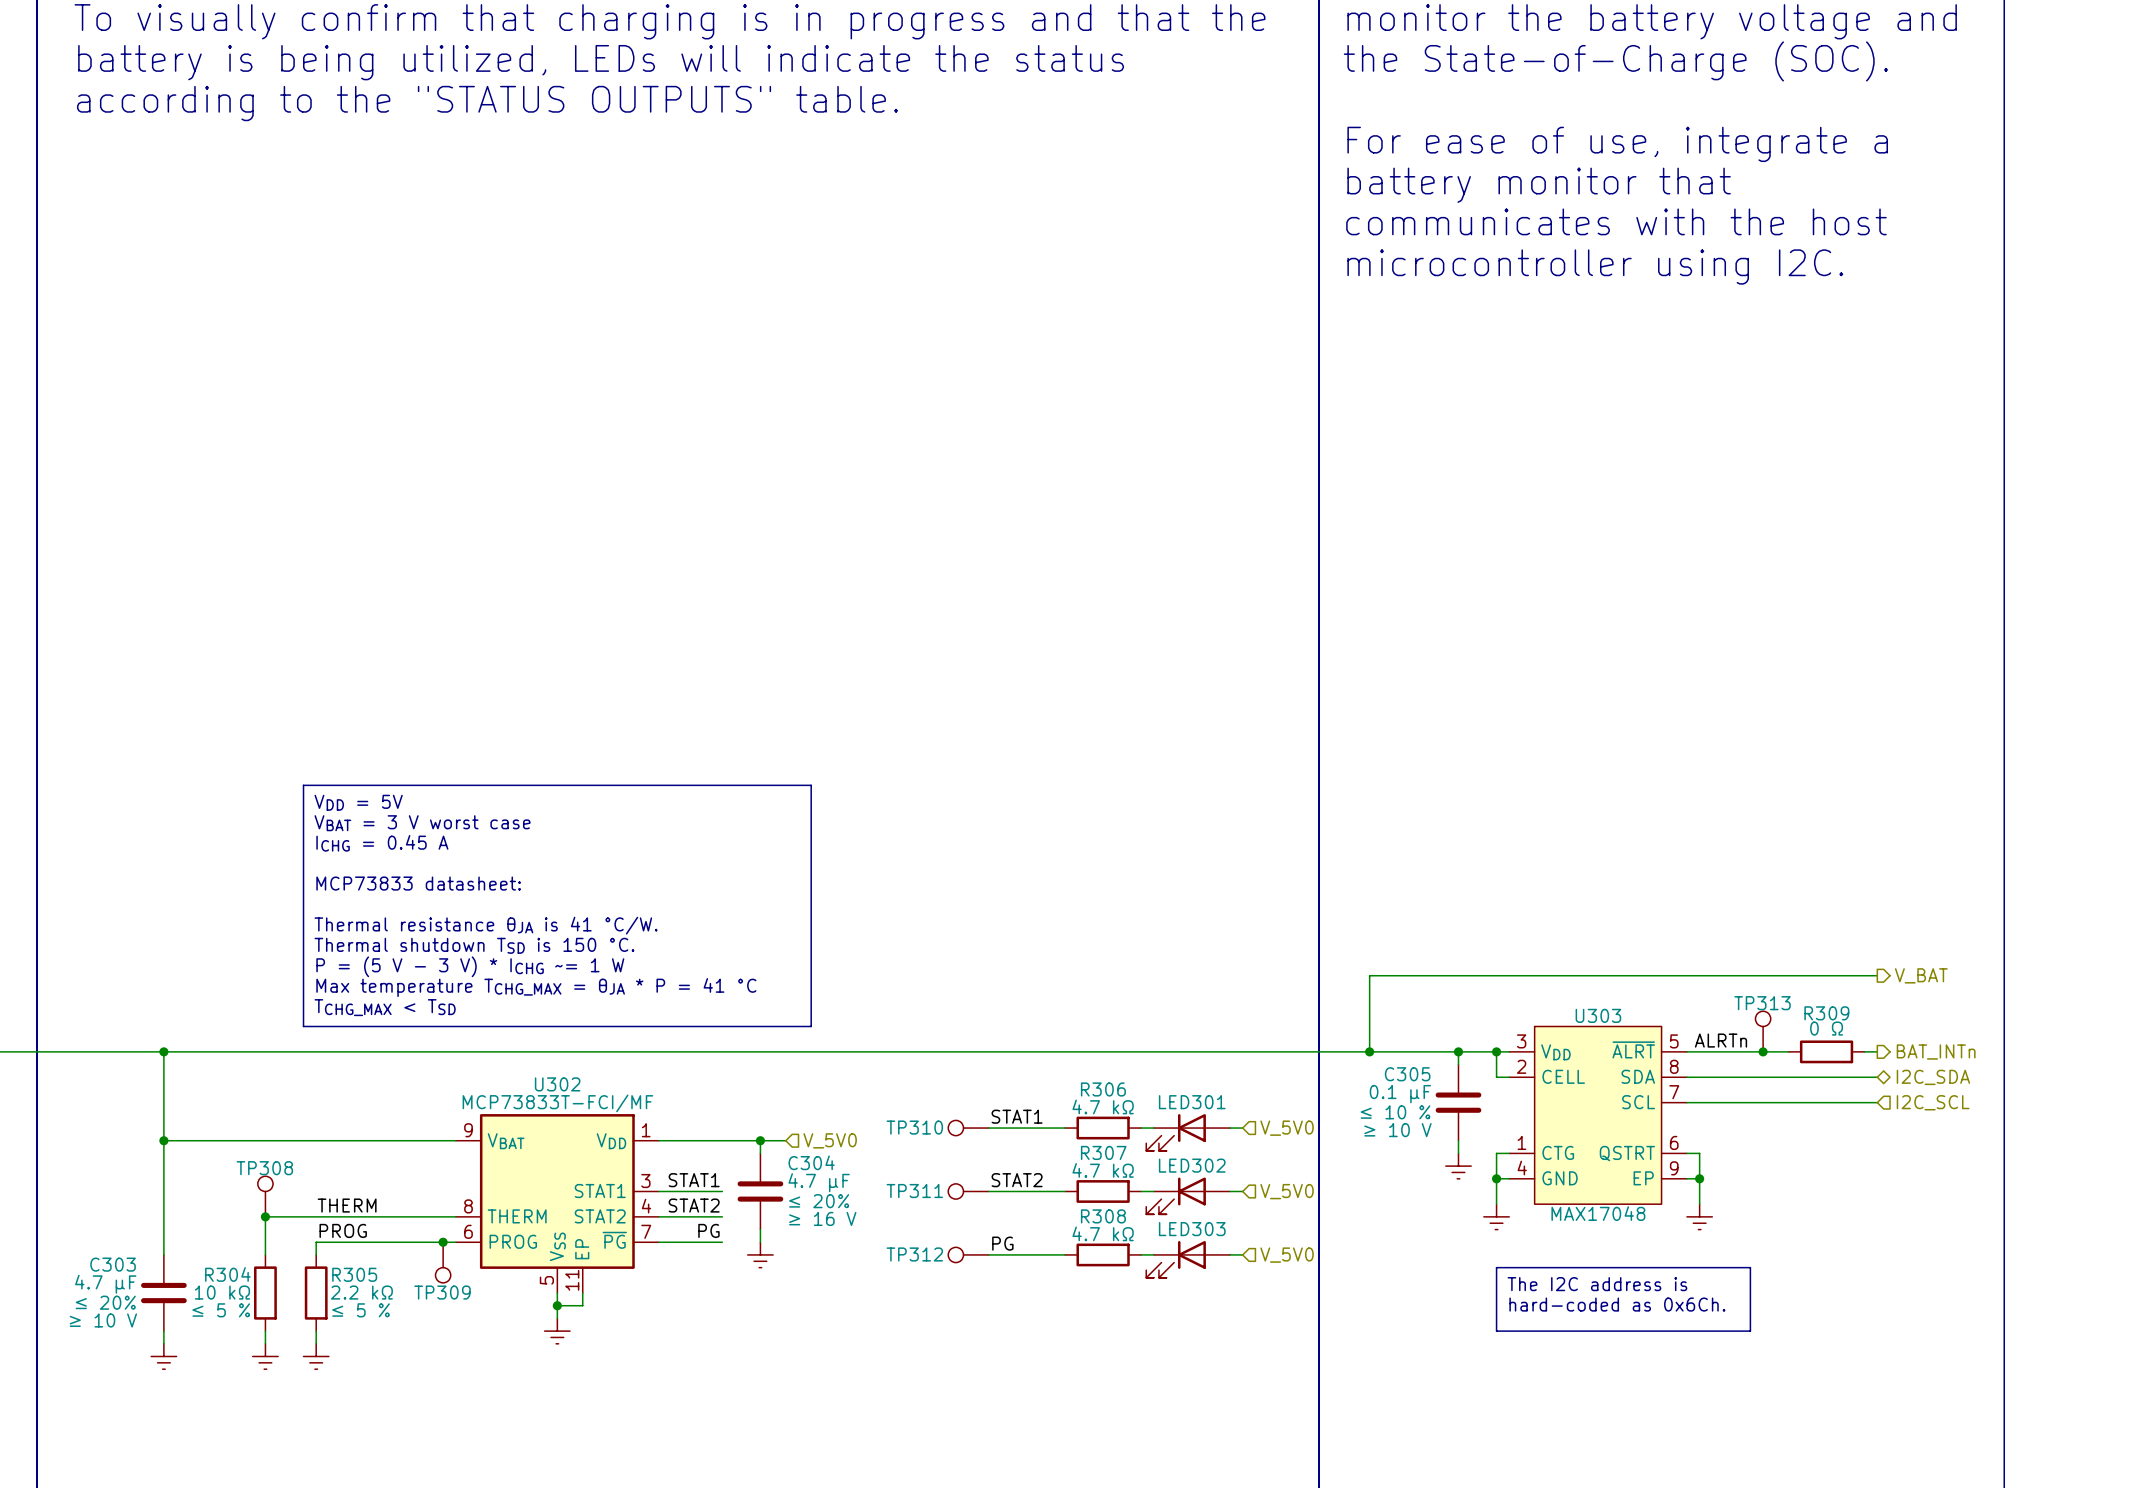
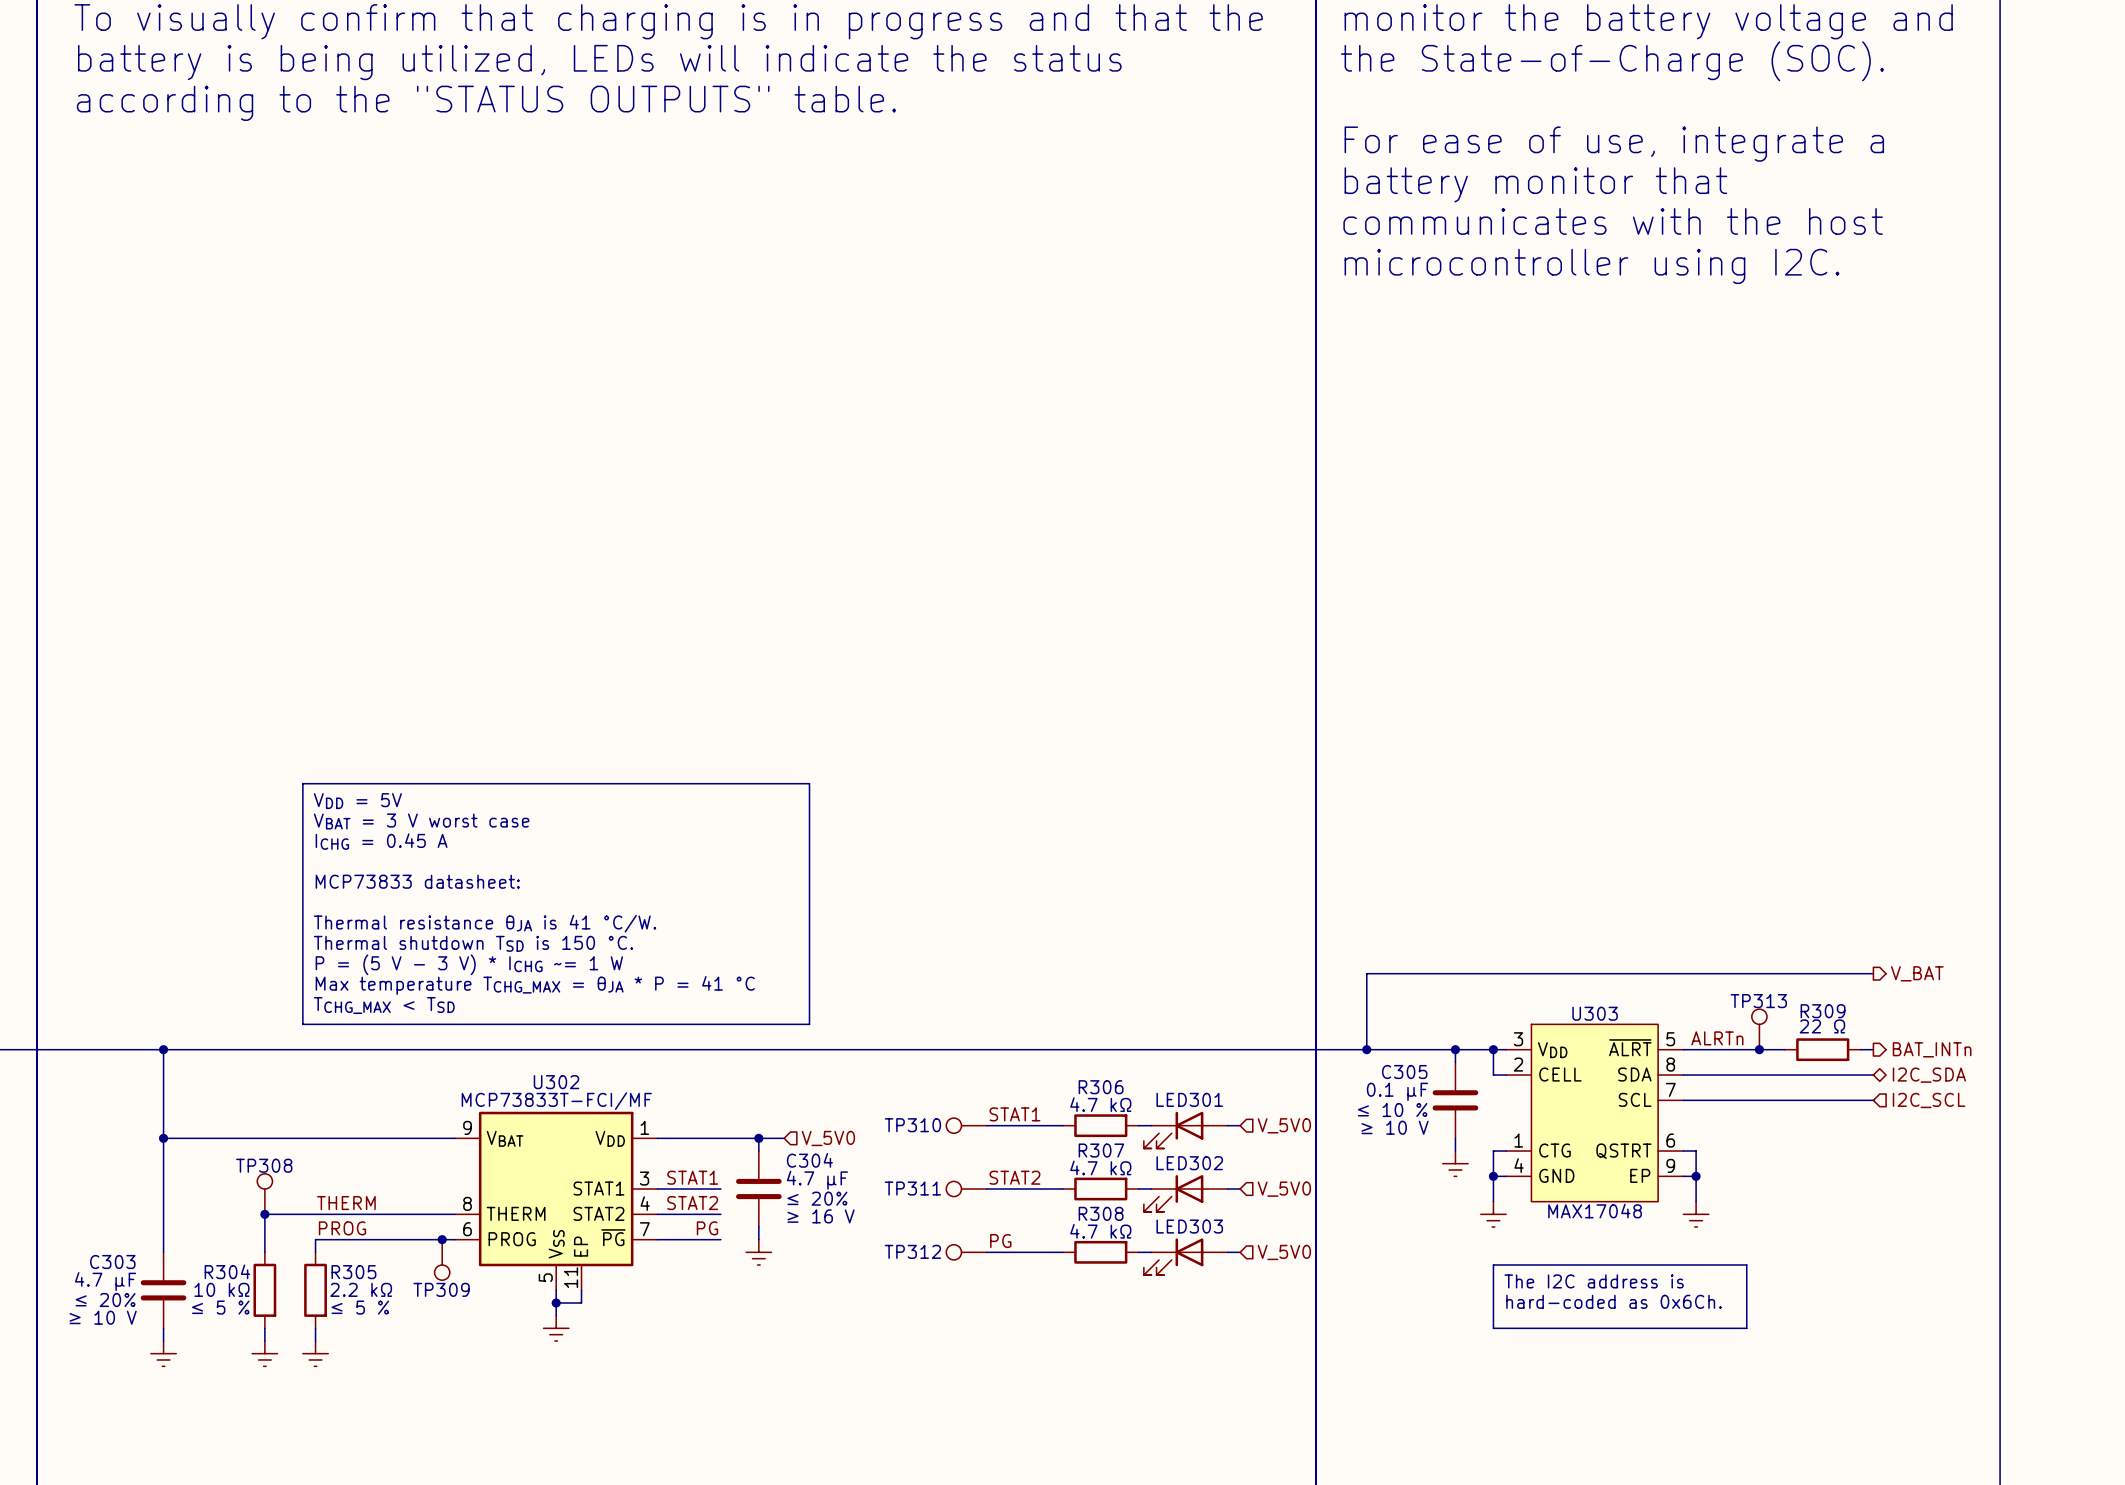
R309 value: 0 Ω (1826, 1028) -> 22 Ω (1822, 1026)

